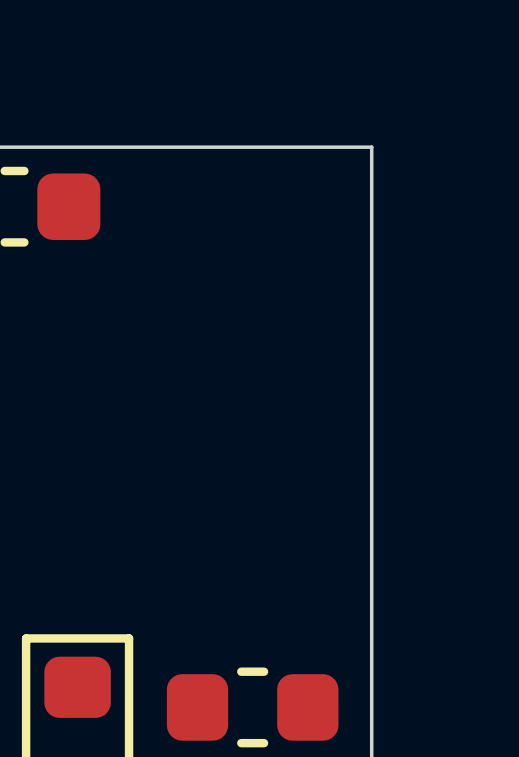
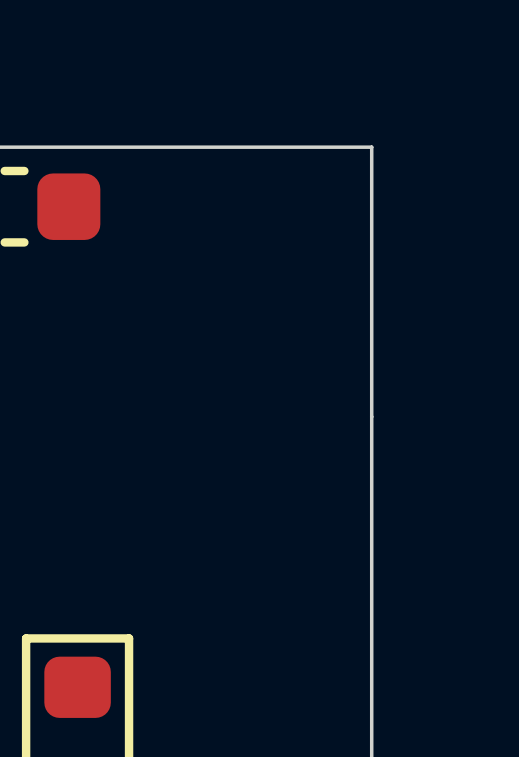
part: (252, 707) -> none

